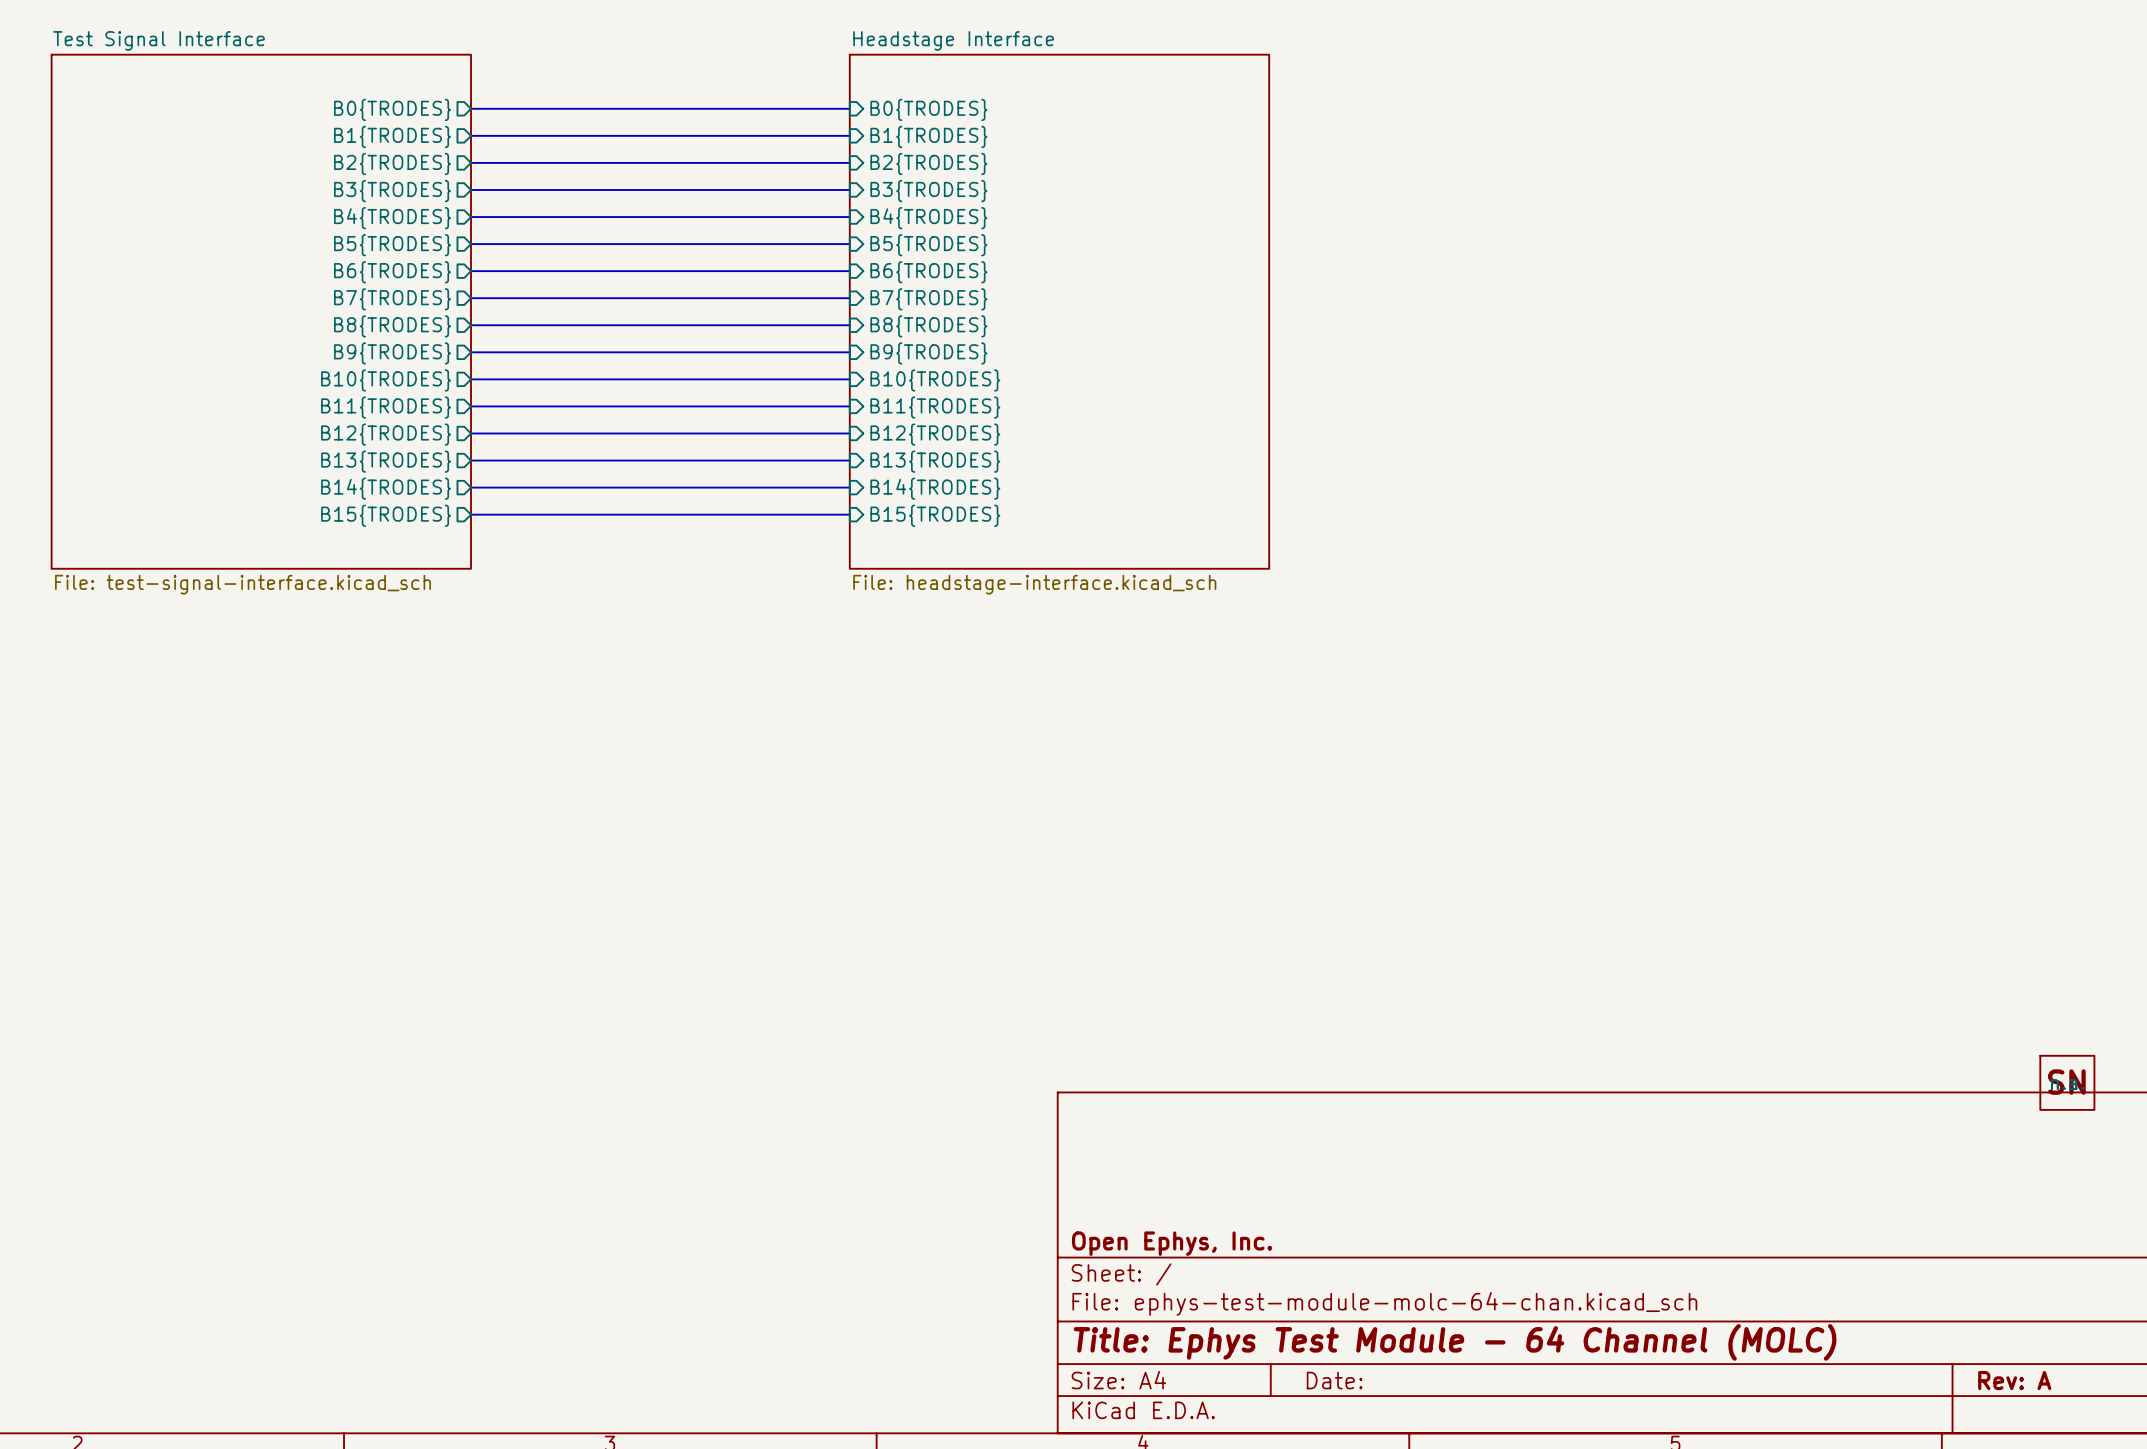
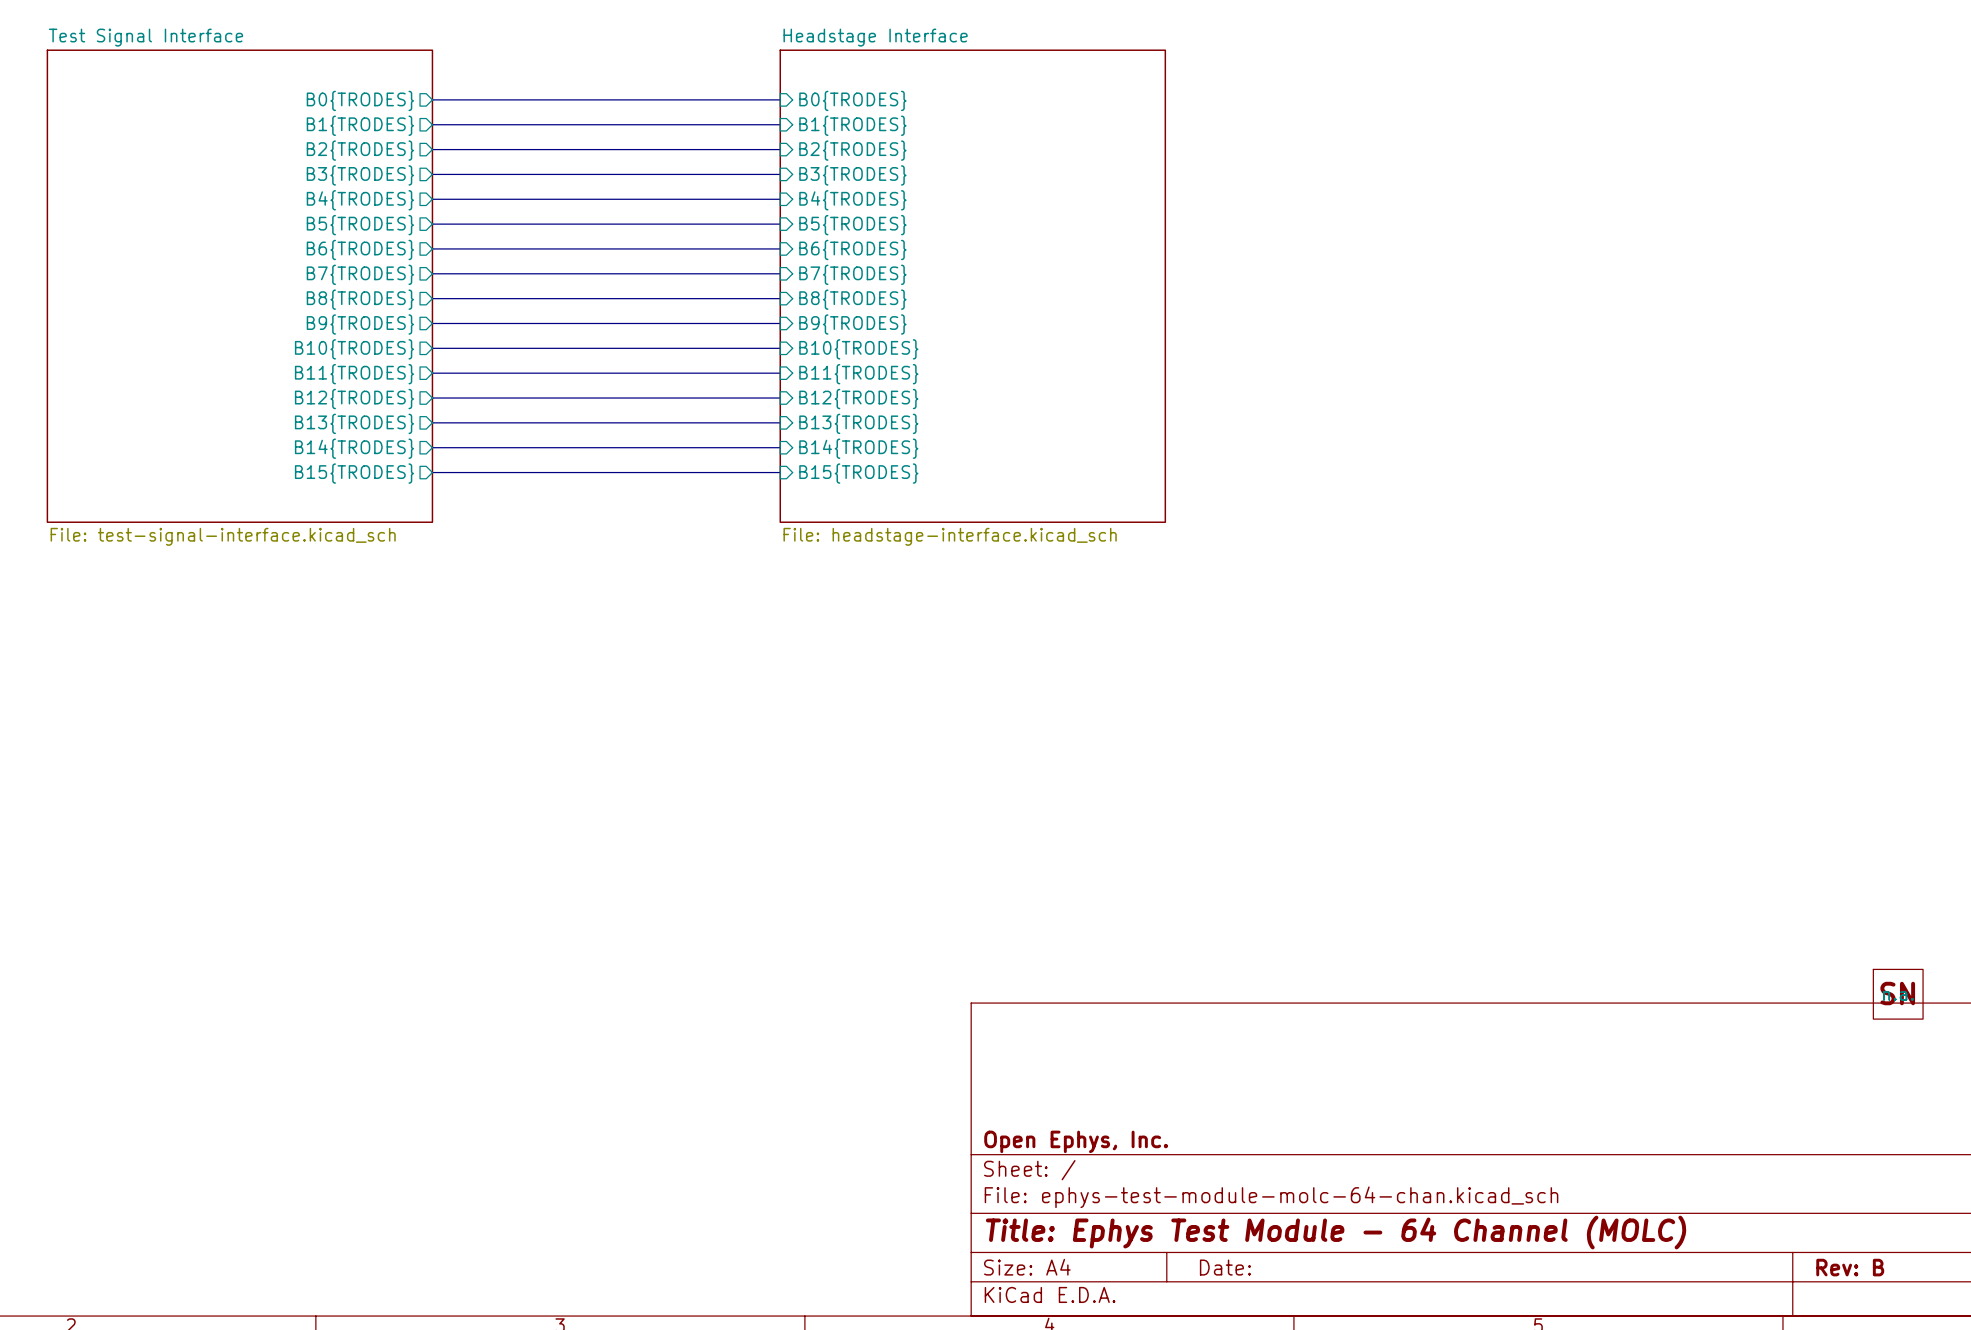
title block: Rev: A (2014, 1380) -> Rev: B (1850, 1267)

